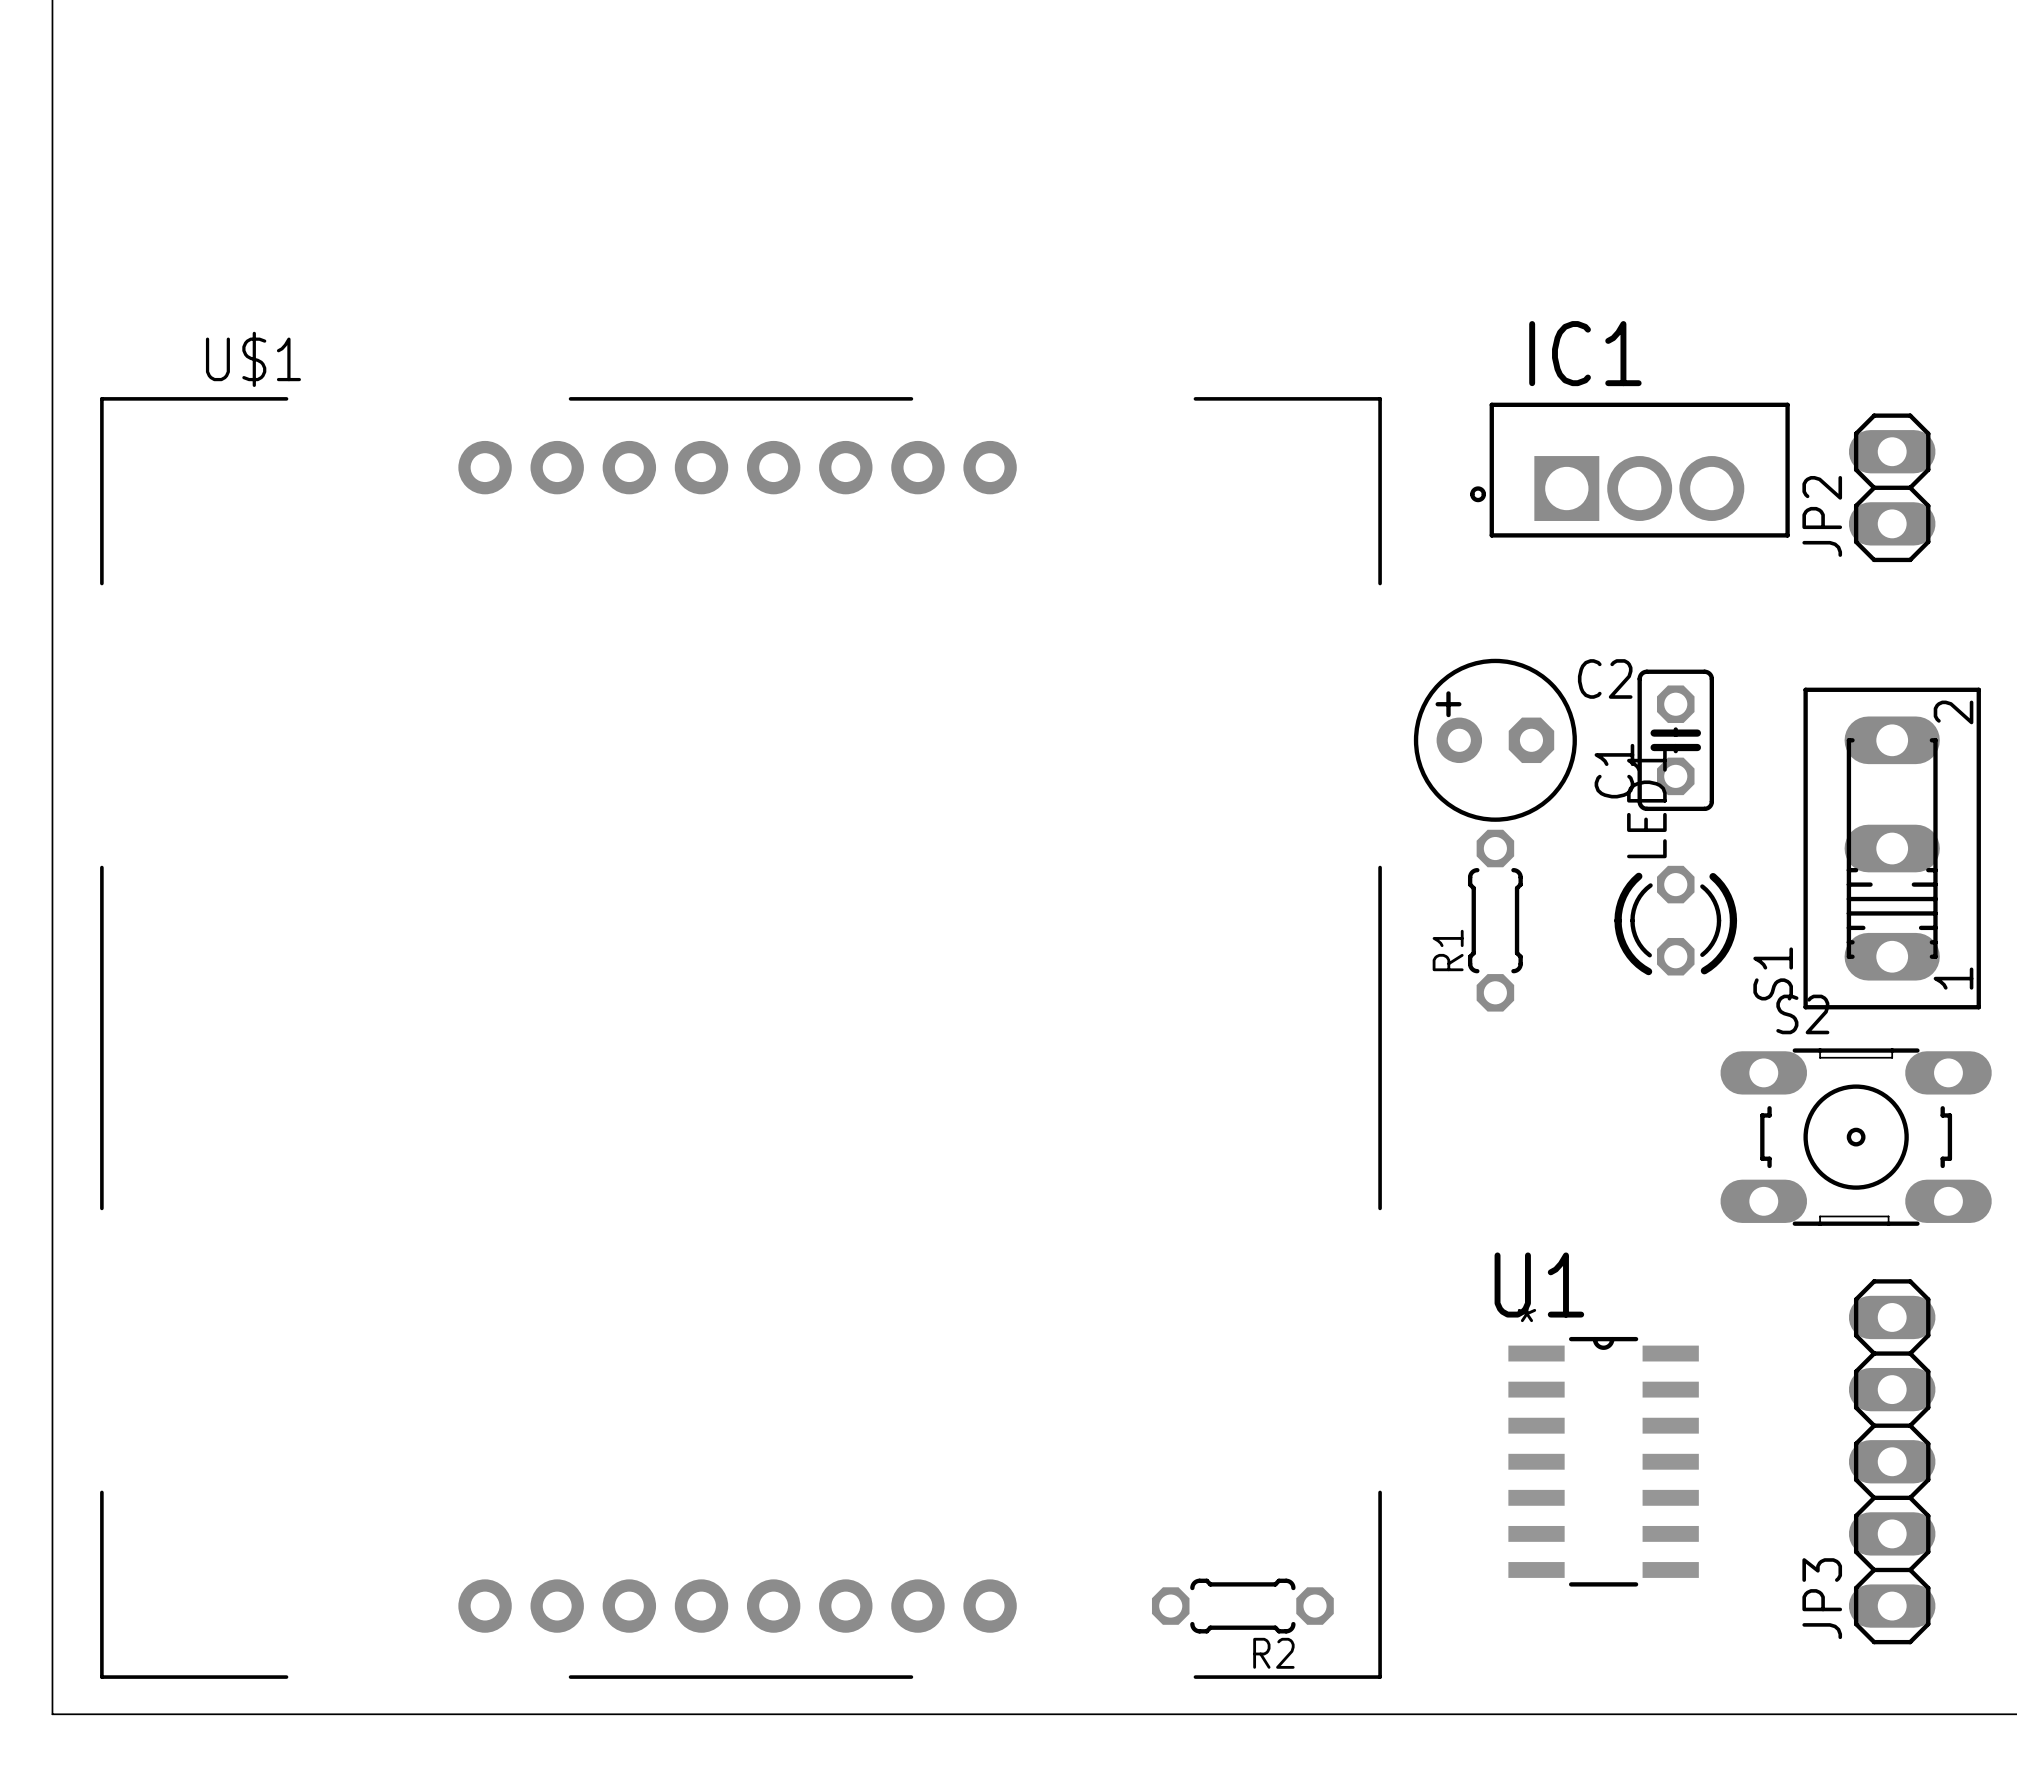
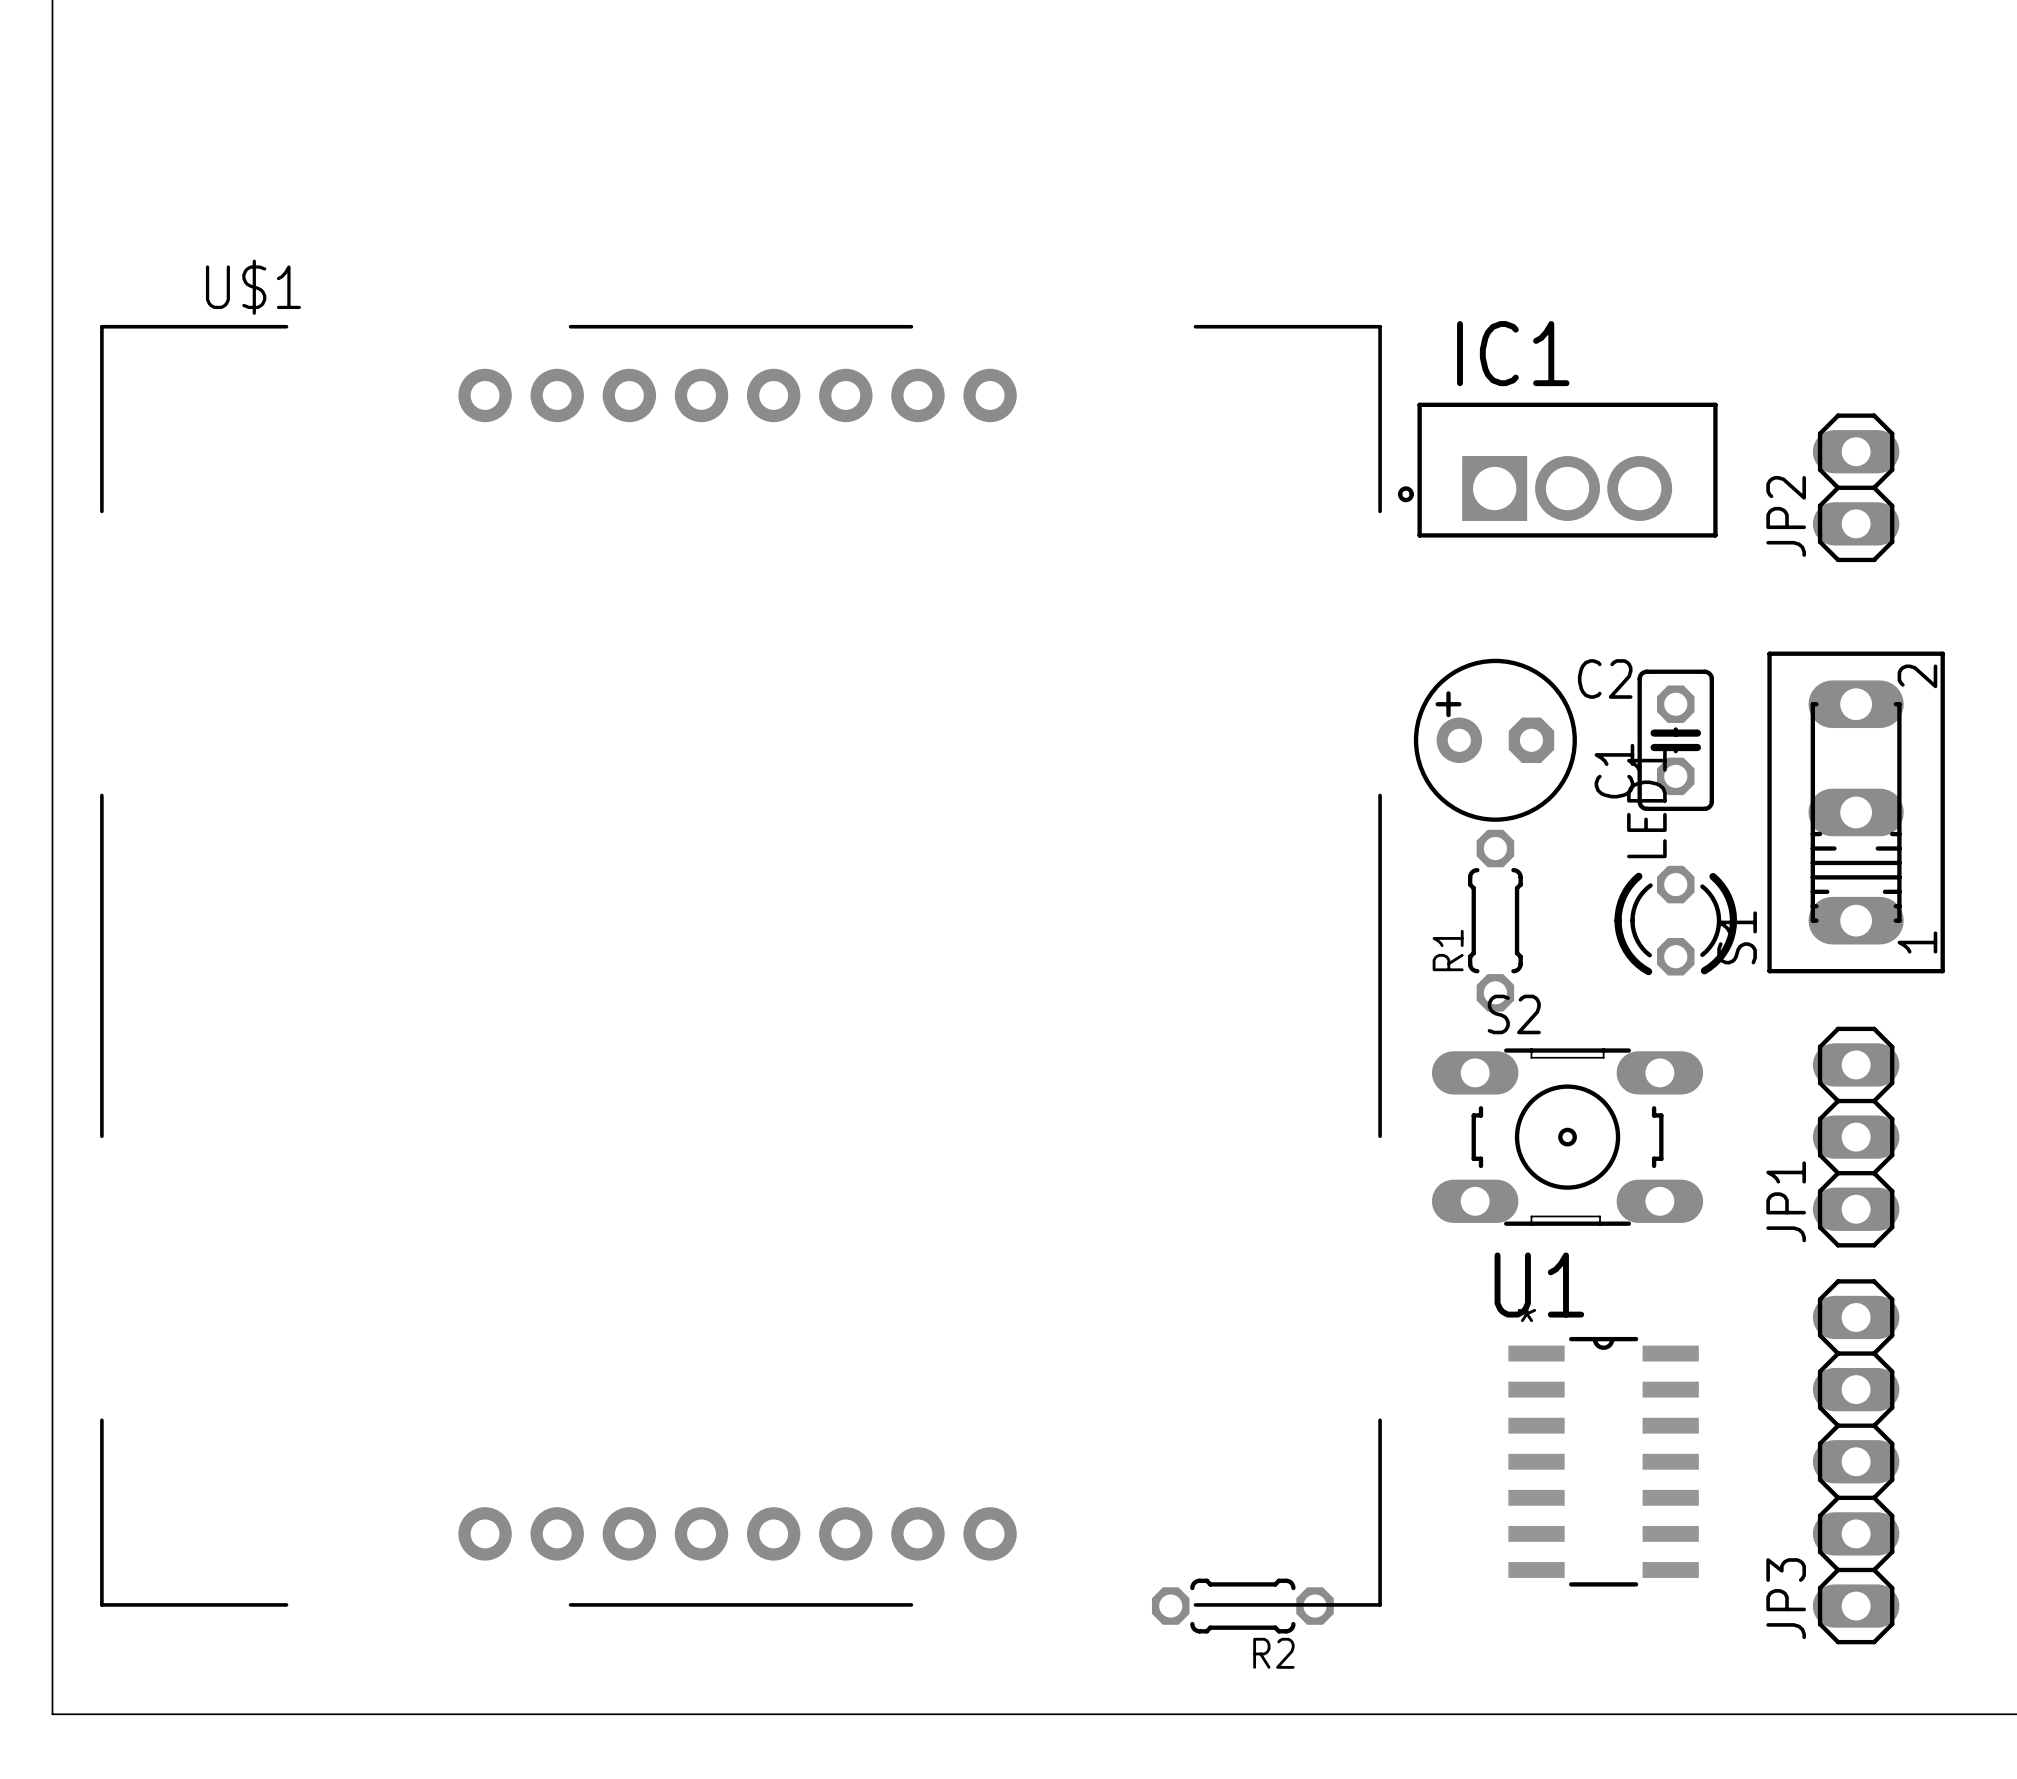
IC1 position: (1629, 470) -> (1557, 470)
JP2 position: (1892, 487) -> (1856, 487)
S1 position: (1892, 848) -> (1856, 812)
U$1 position: (740, 1037) -> (740, 965)
S2 position: (1856, 1137) -> (1567, 1137)
JP1: none -> (1856, 1137)
JP3 position: (1892, 1461) -> (1856, 1461)

